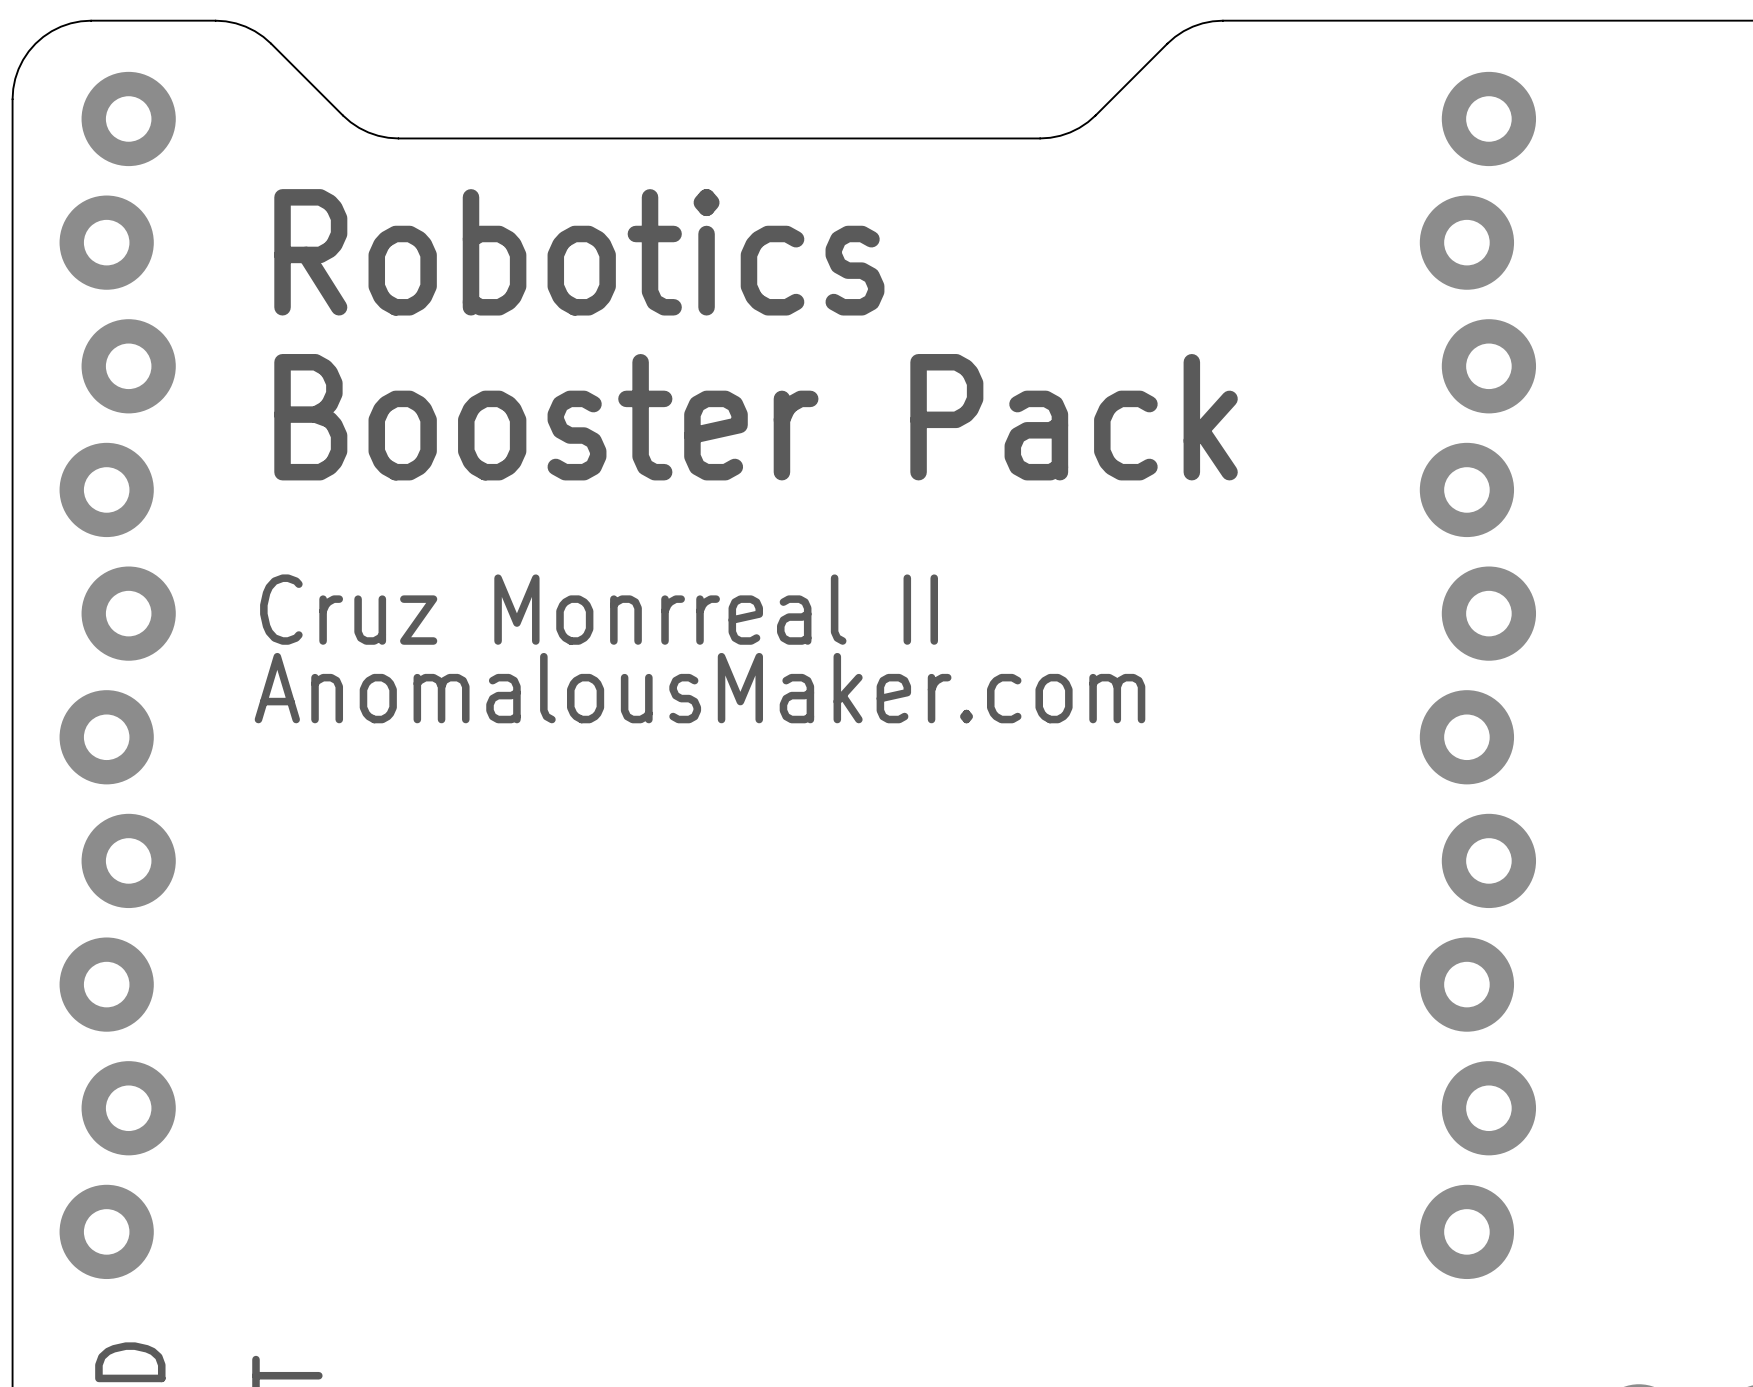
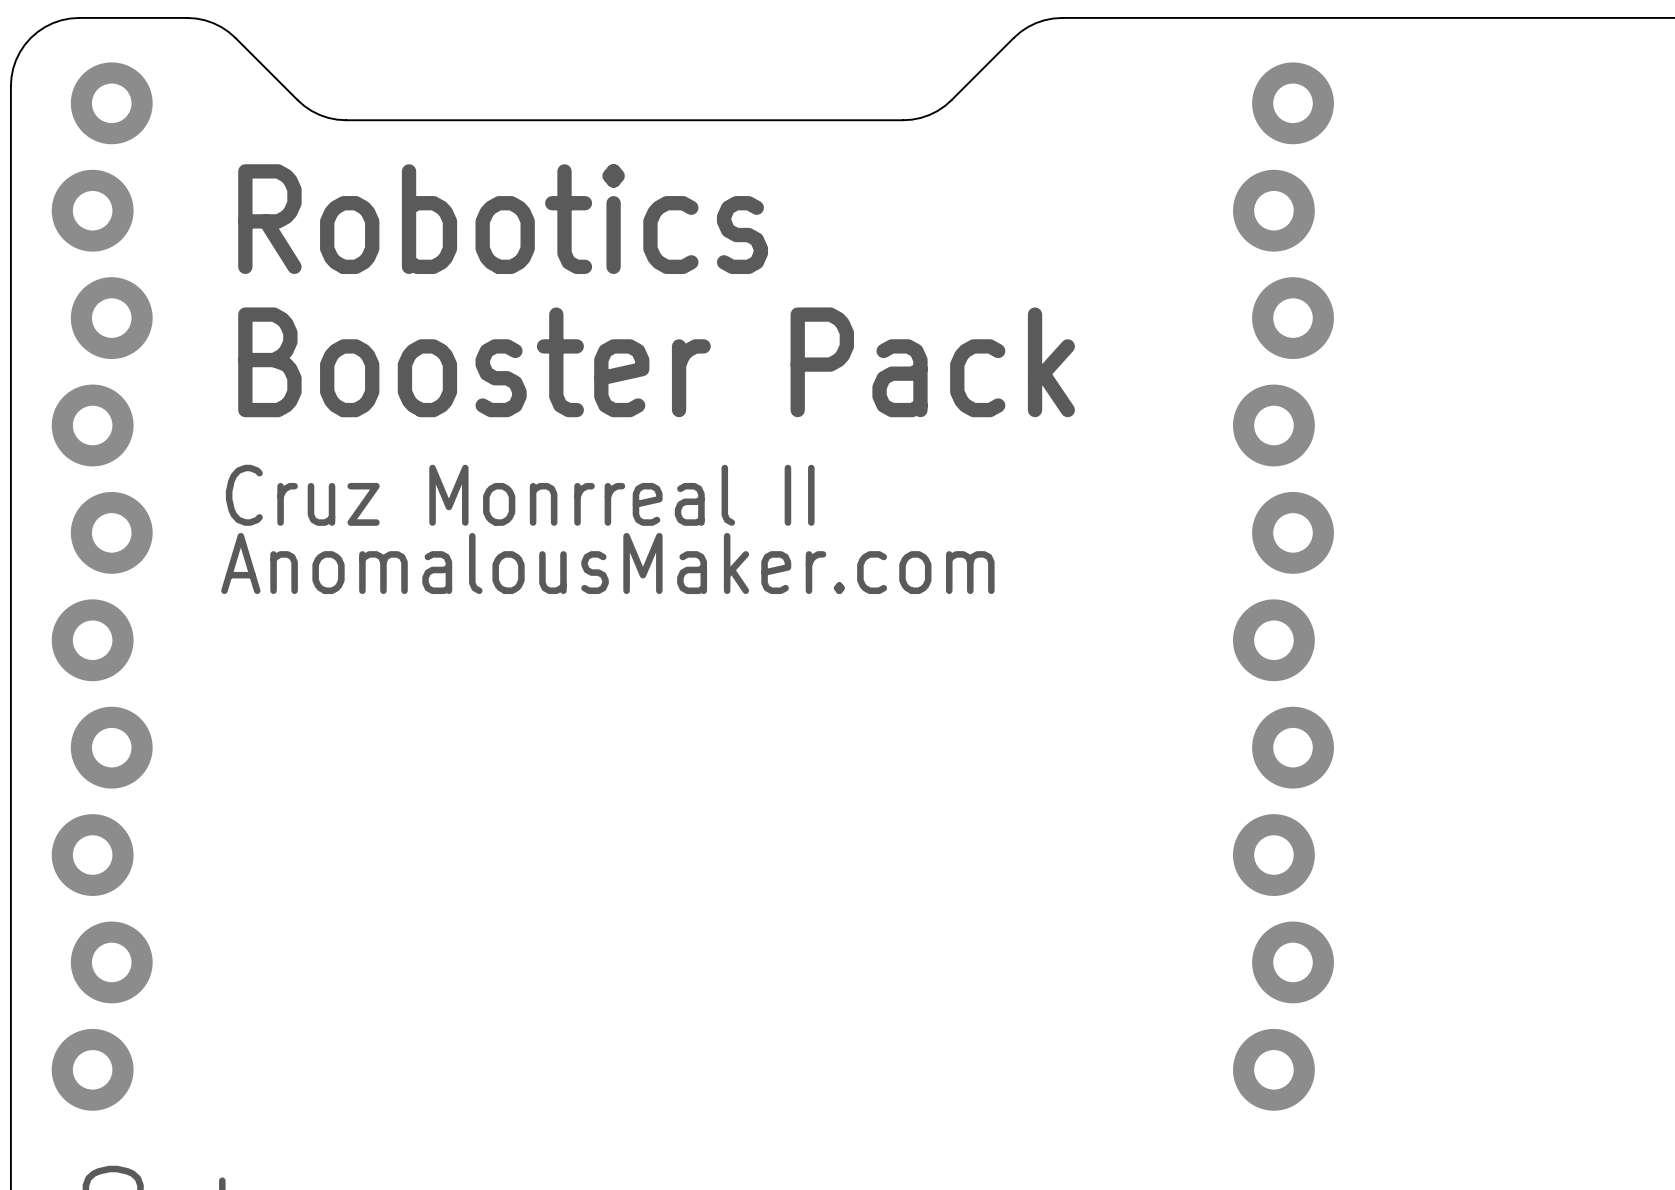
text position: Cruz Monrreal II (599, 609) -> Cruz Monrreal II (520, 495)
text position: AnomalousMaker.com (700, 688) -> AnomalousMaker.com (607, 563)

